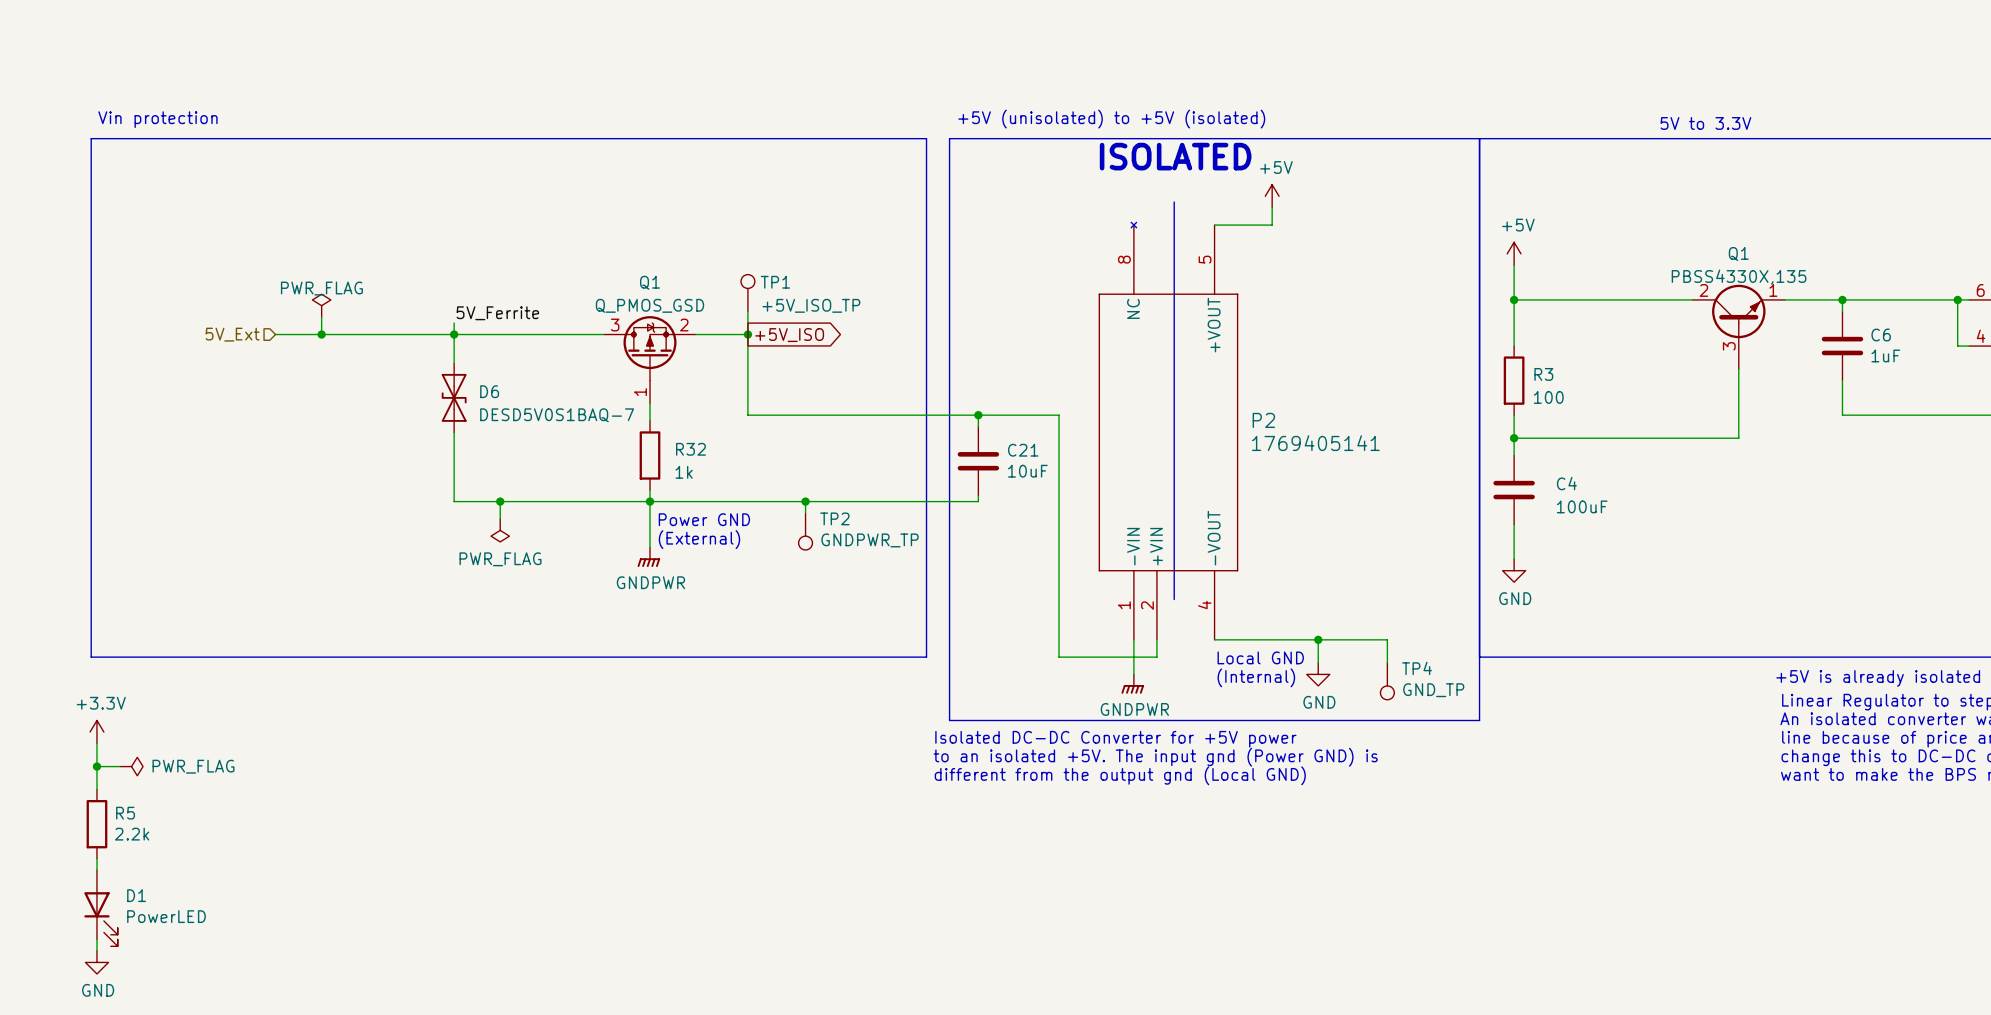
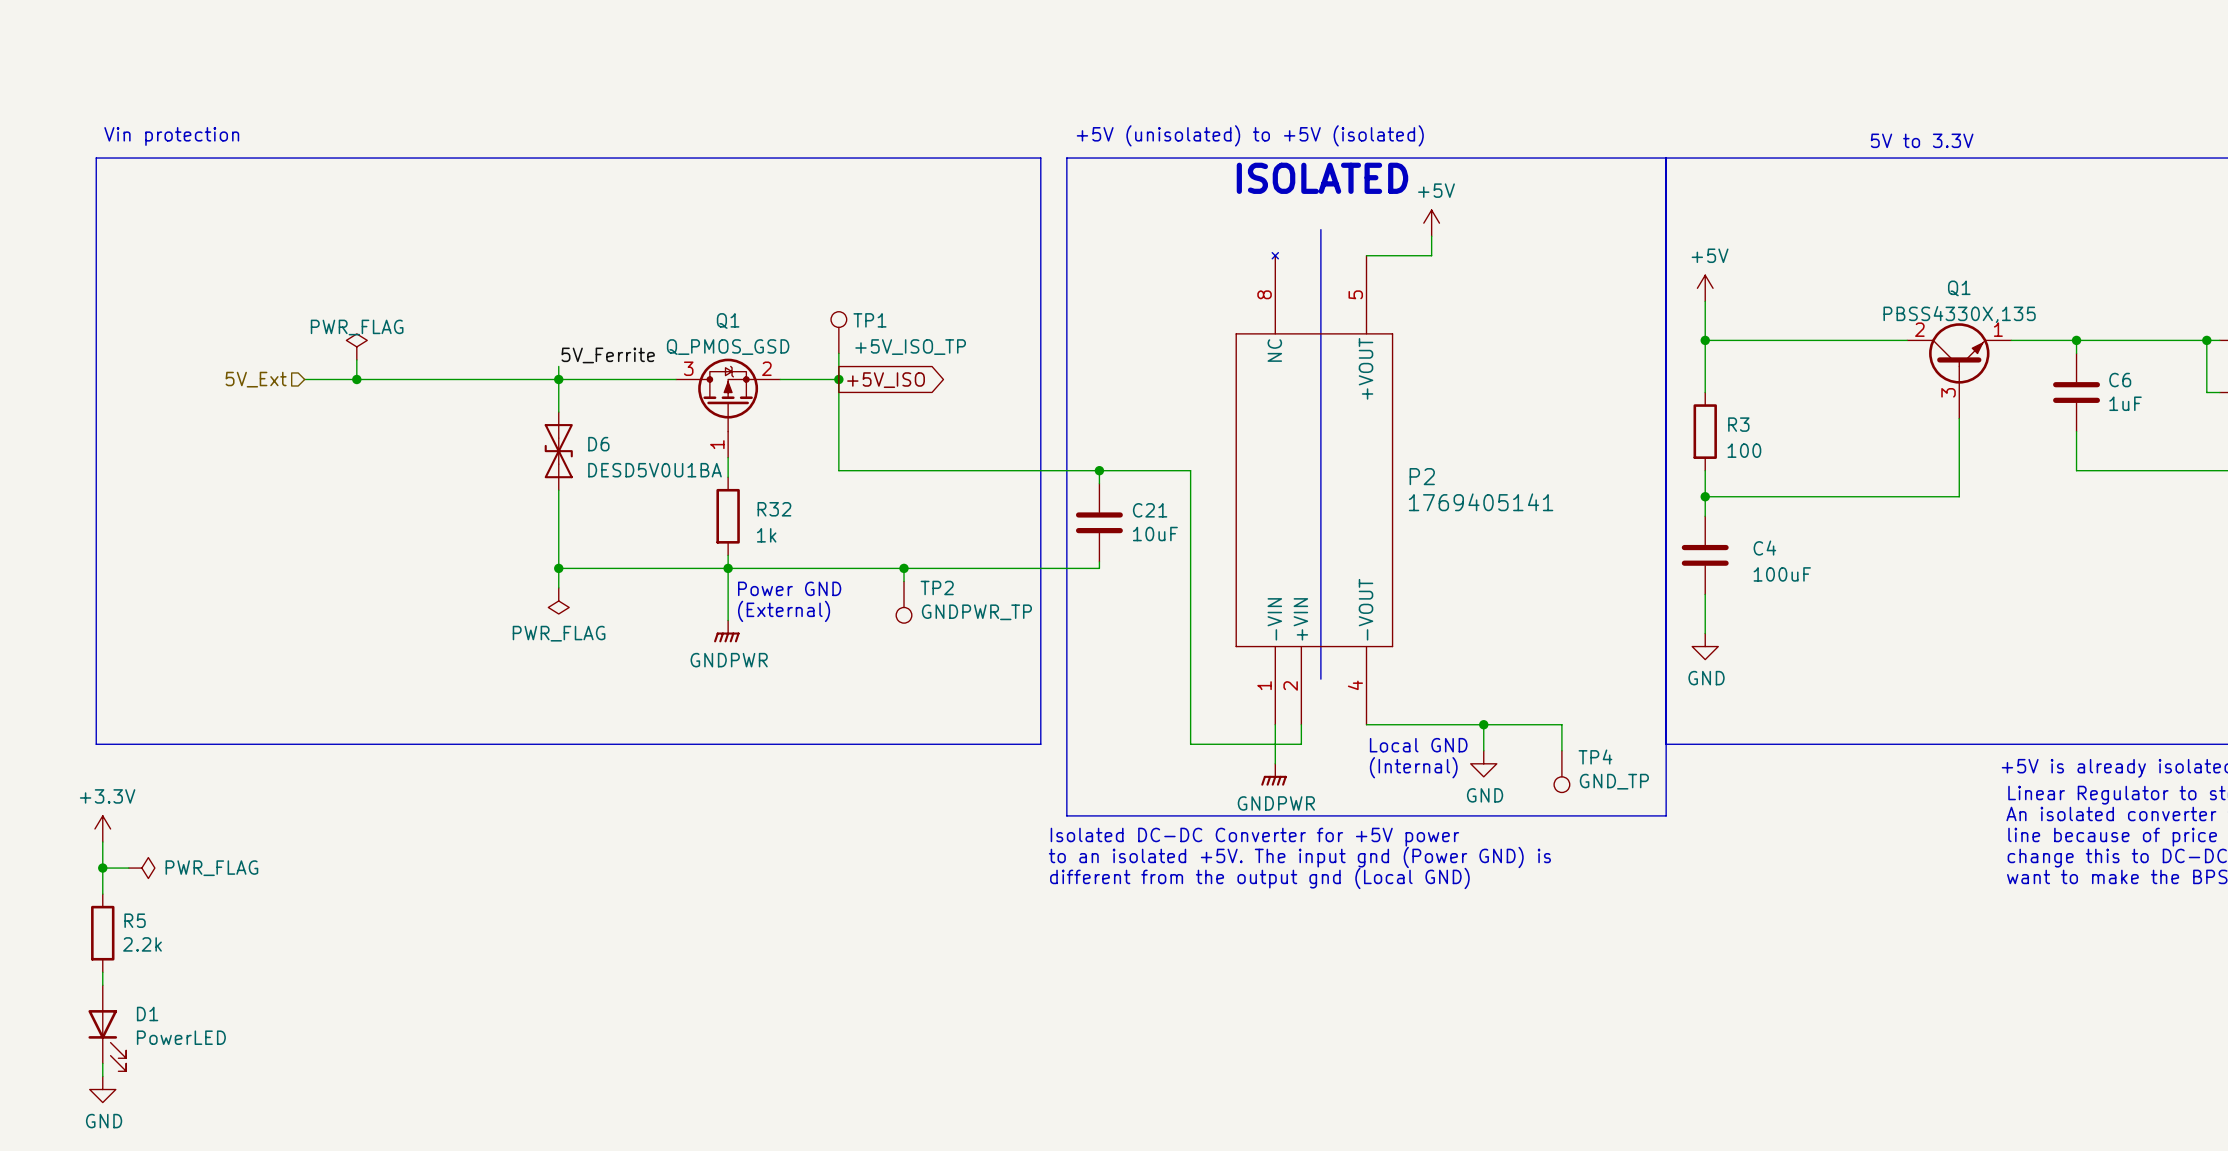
label position: 5V_Ferrite (497, 313) -> 5V_Ferrite (608, 355)
wire: (454, 323) (454, 363) -> (558, 366) (558, 412)
junction position: (454, 334) -> (558, 379)
D6 position: (454, 397) -> (558, 451)
D6 value: DESD5V0S1BAQ-7 (557, 415) -> DESD5V0U1BA (655, 470)
wire: (454, 432) (454, 501) (500, 501) -> (558, 490) (558, 568)

